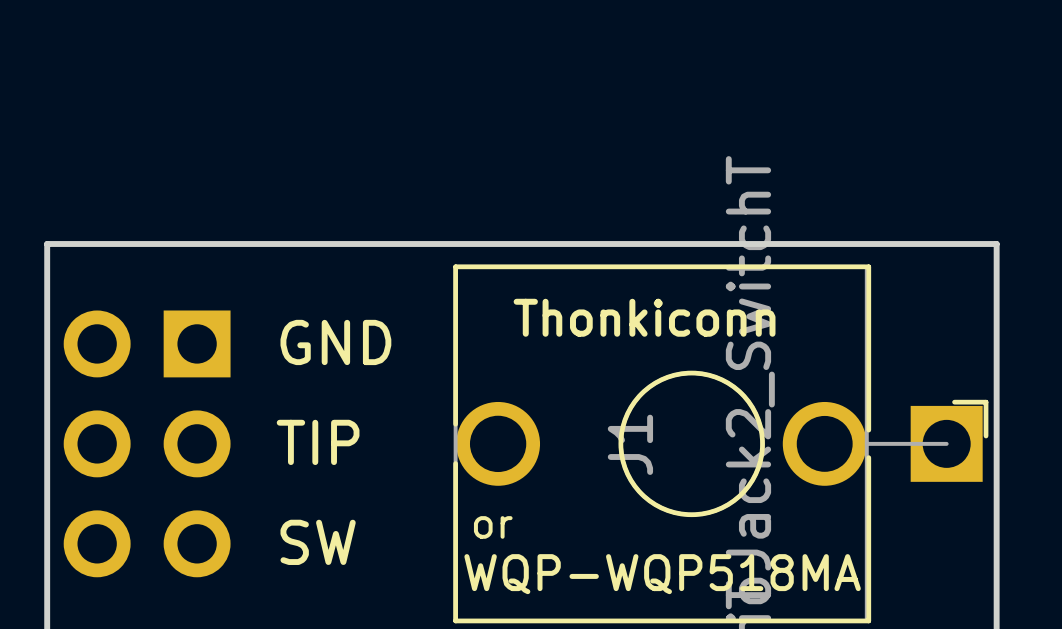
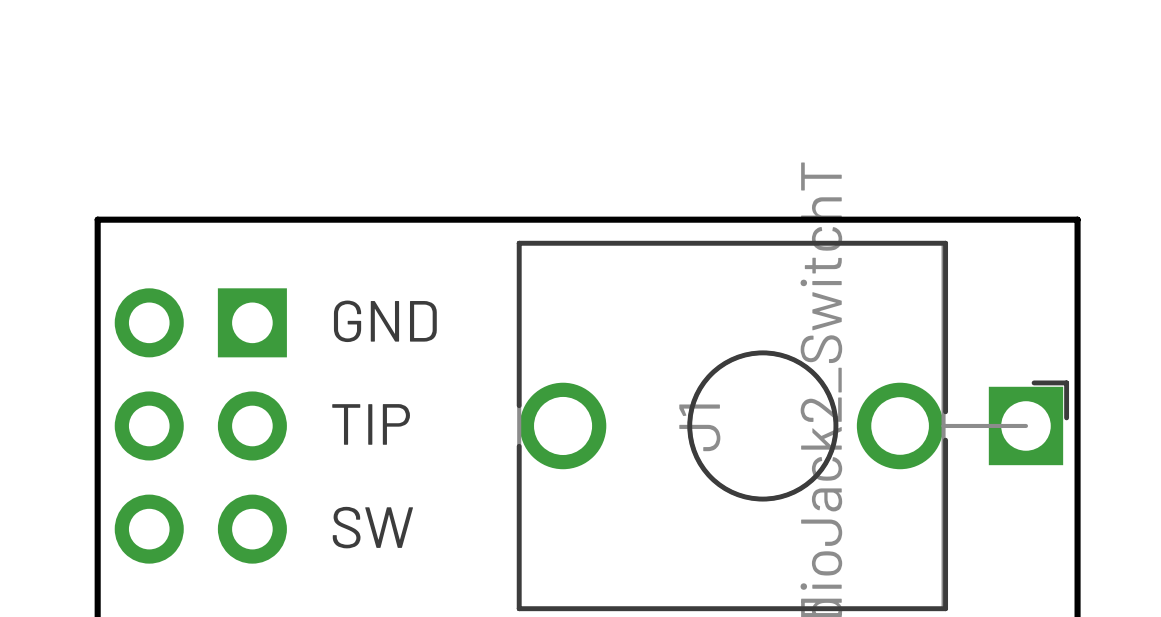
text: Thonkiconn (644, 317) -> none
text: or (493, 527) -> none
text: WQP-WQP518MA (662, 574) -> none

